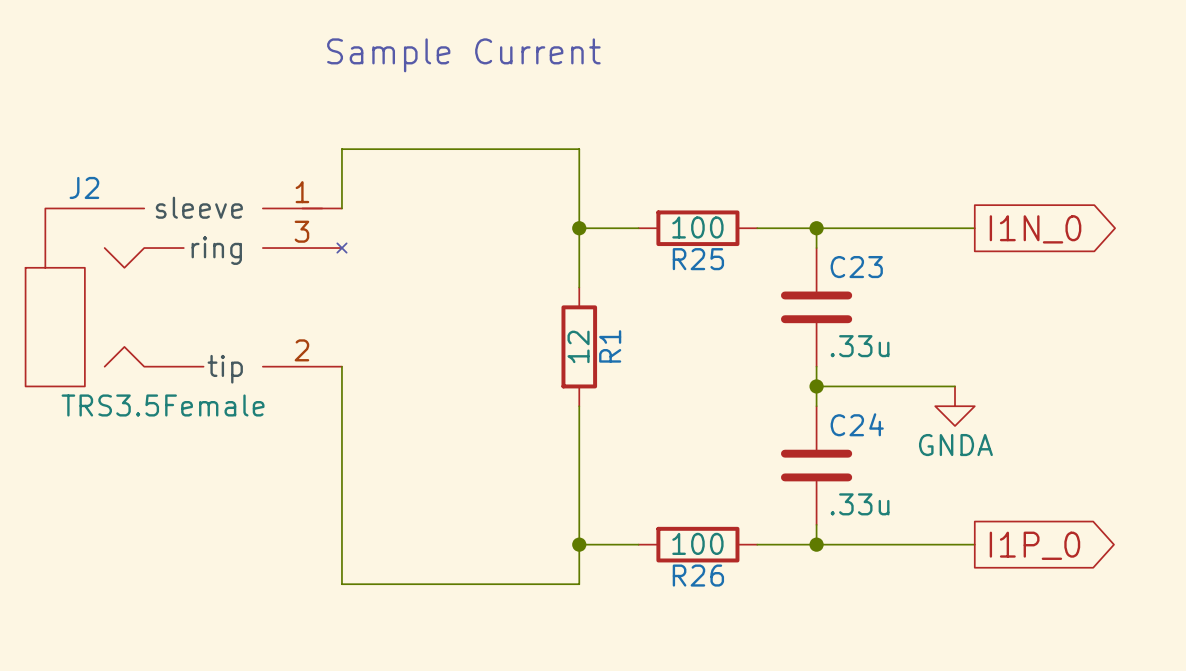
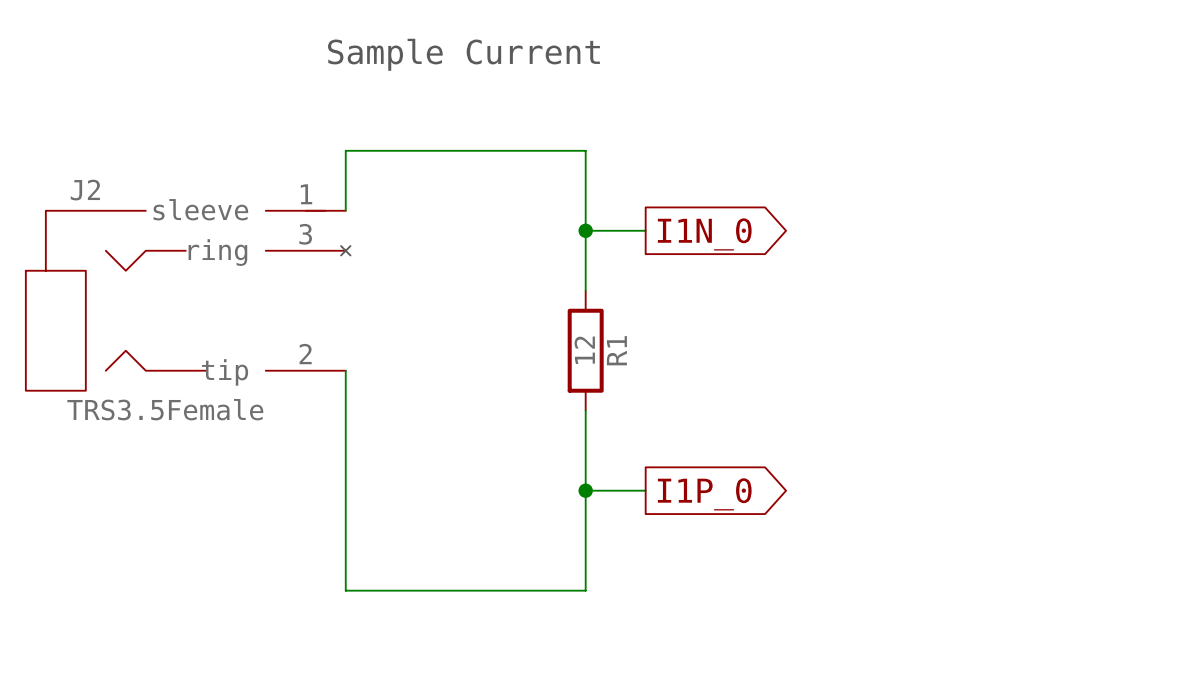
R25: 100 (697, 228) -> none
wire: (757, 228) (974, 228) -> none
wire: (816, 228) (816, 248) -> none
junction: (816, 228) -> none
global label position: I1N_0 (1035, 229) -> I1N_0 (704, 234)
C23: .33u (816, 307) -> none
wire: (816, 366) (816, 406) -> none
wire: (816, 386) (955, 386) -> none
junction: (816, 386) -> none
power symbol: GNDA (955, 406) -> none
C24: .33u (816, 465) -> none
wire: (816, 524) (816, 544) -> none
wire: (579, 544) (638, 544) -> (585, 490) (645, 490)
junction position: (579, 544) -> (585, 490)
R26: 100 (697, 544) -> none
wire: (757, 544) (974, 544) -> none
junction: (816, 544) -> none
global label position: I1P_0 (1034, 545) -> I1P_0 (704, 494)

